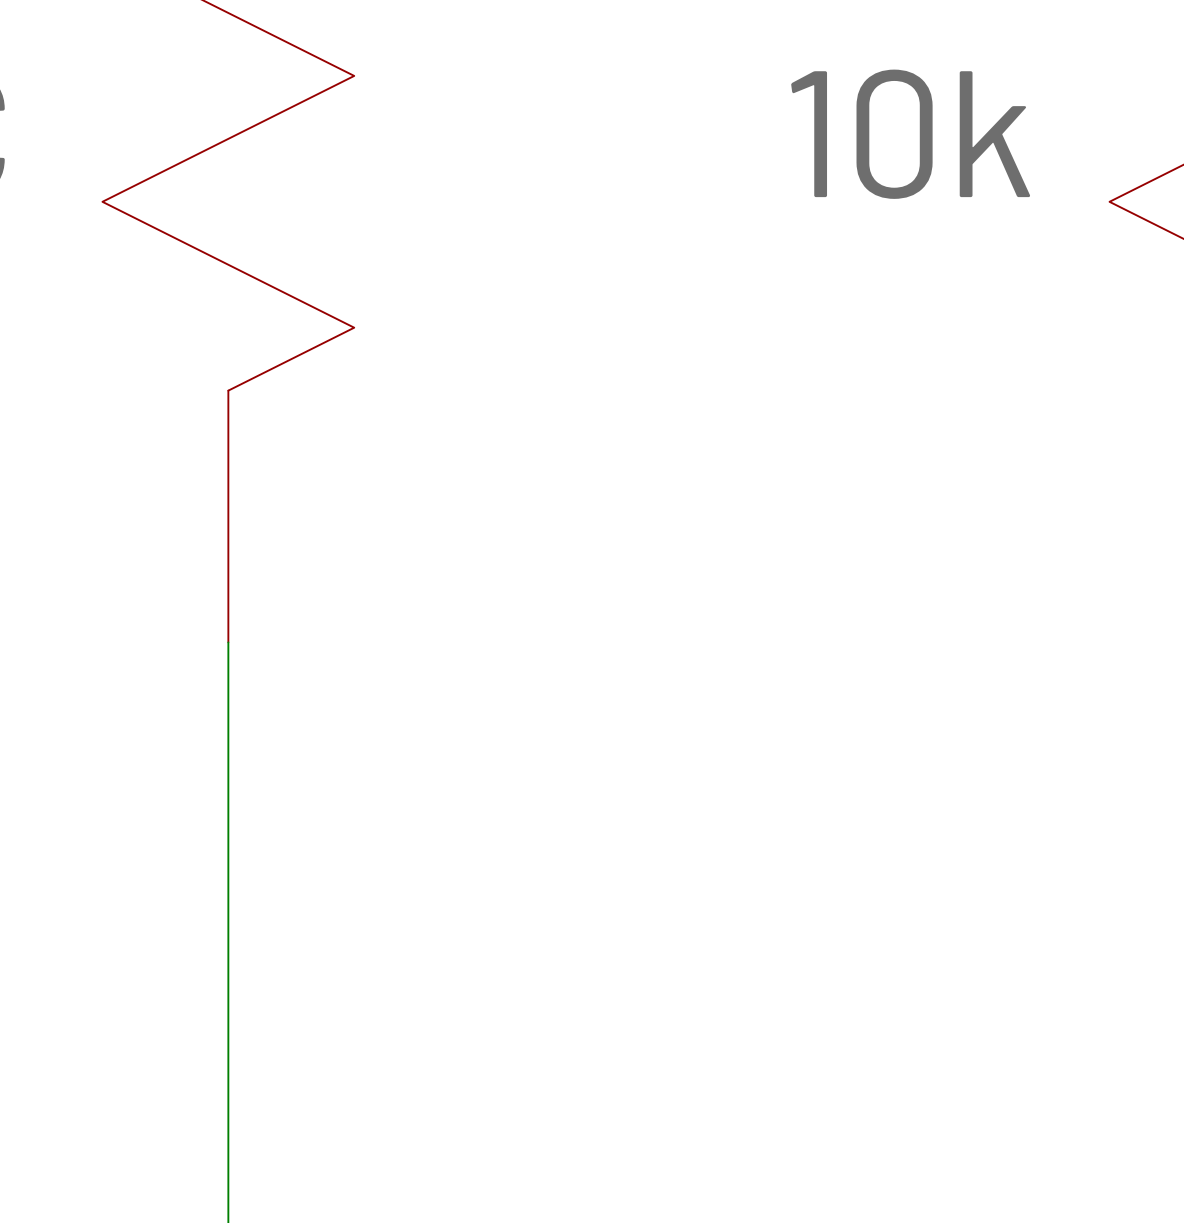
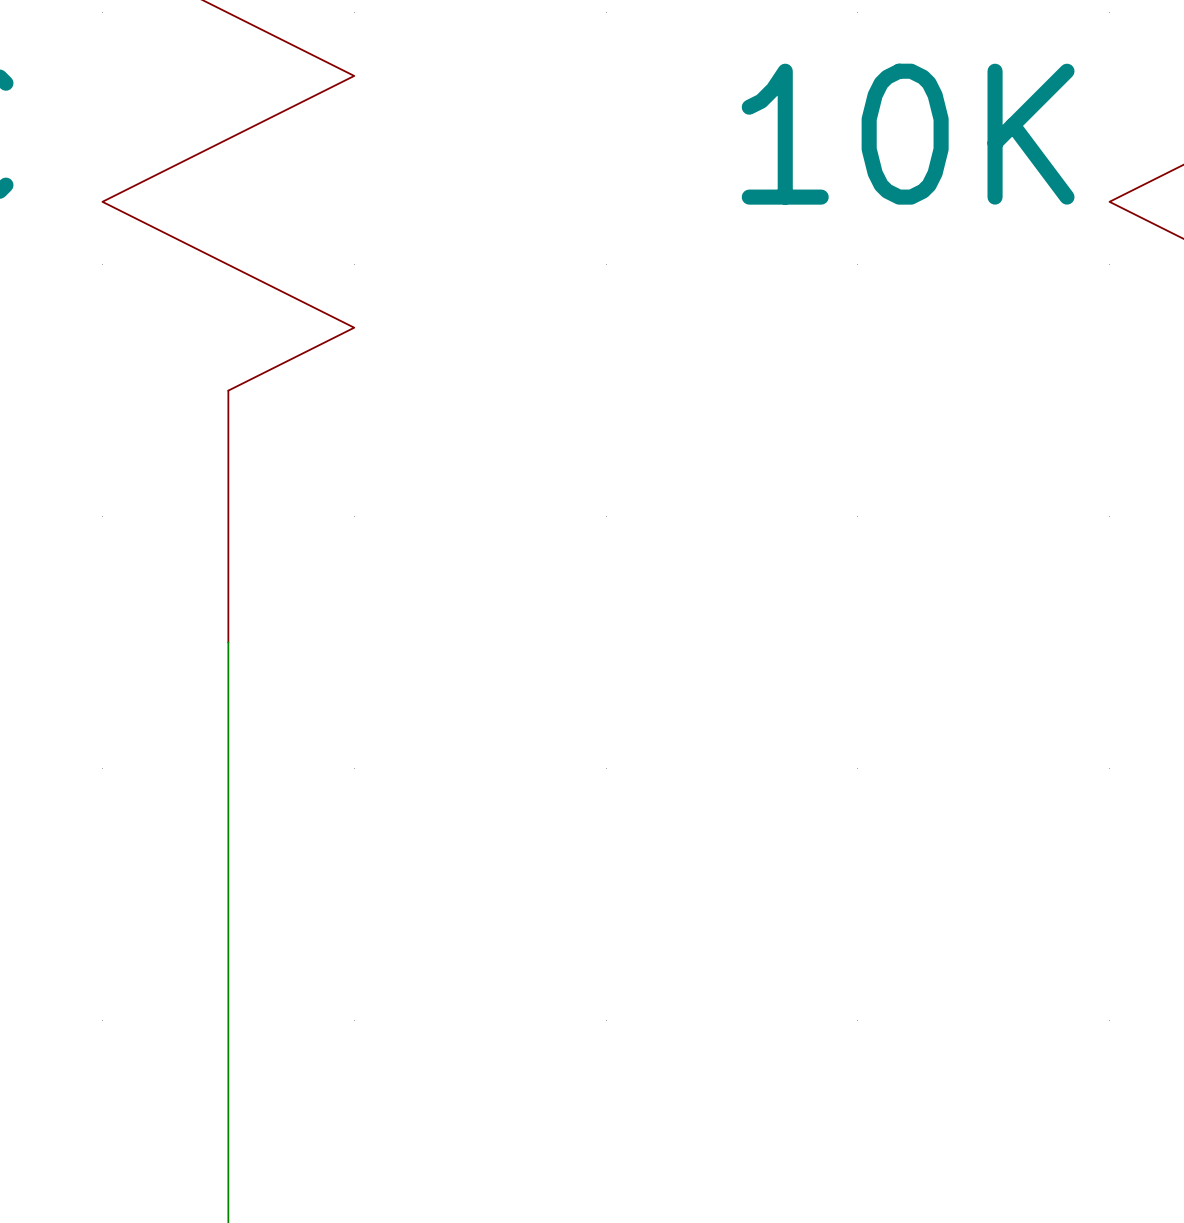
part value: 10k (910, 134) -> 10K (908, 134)

